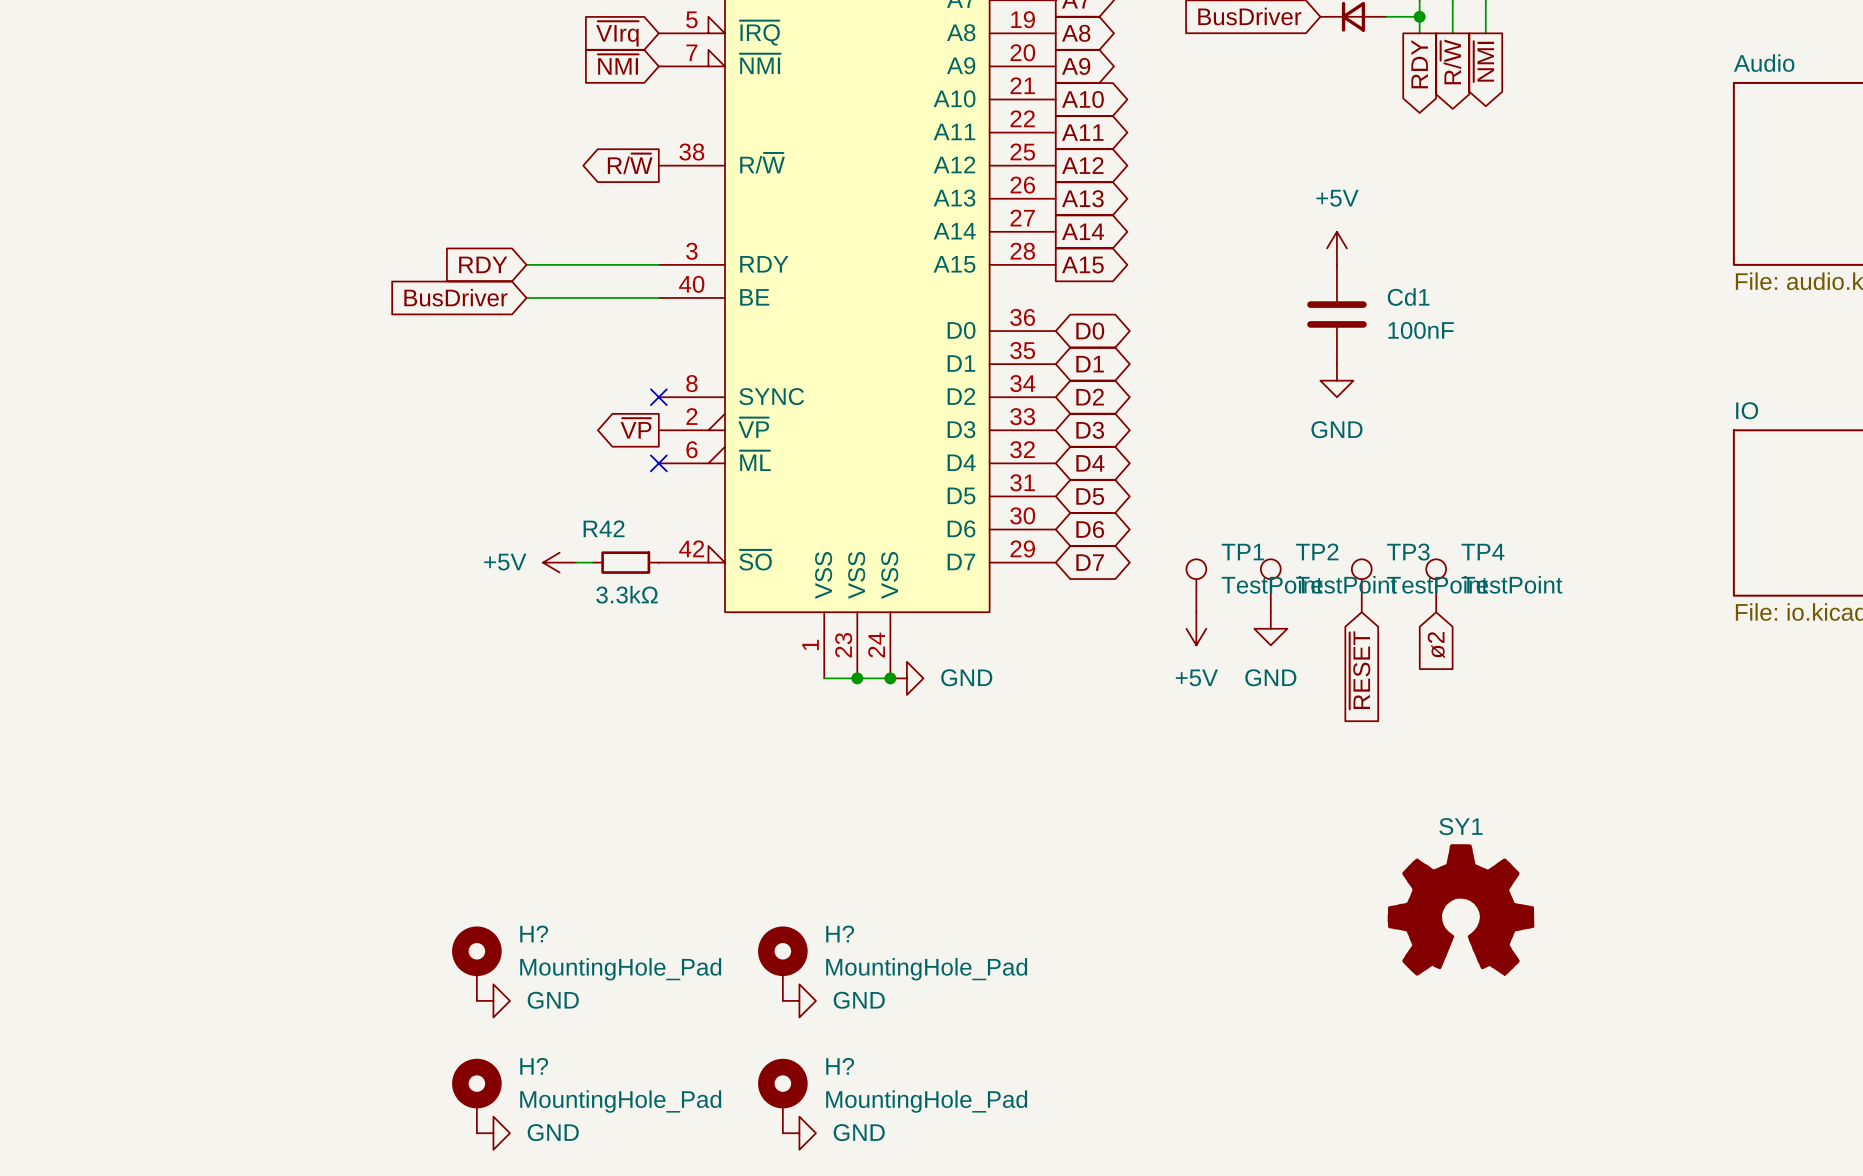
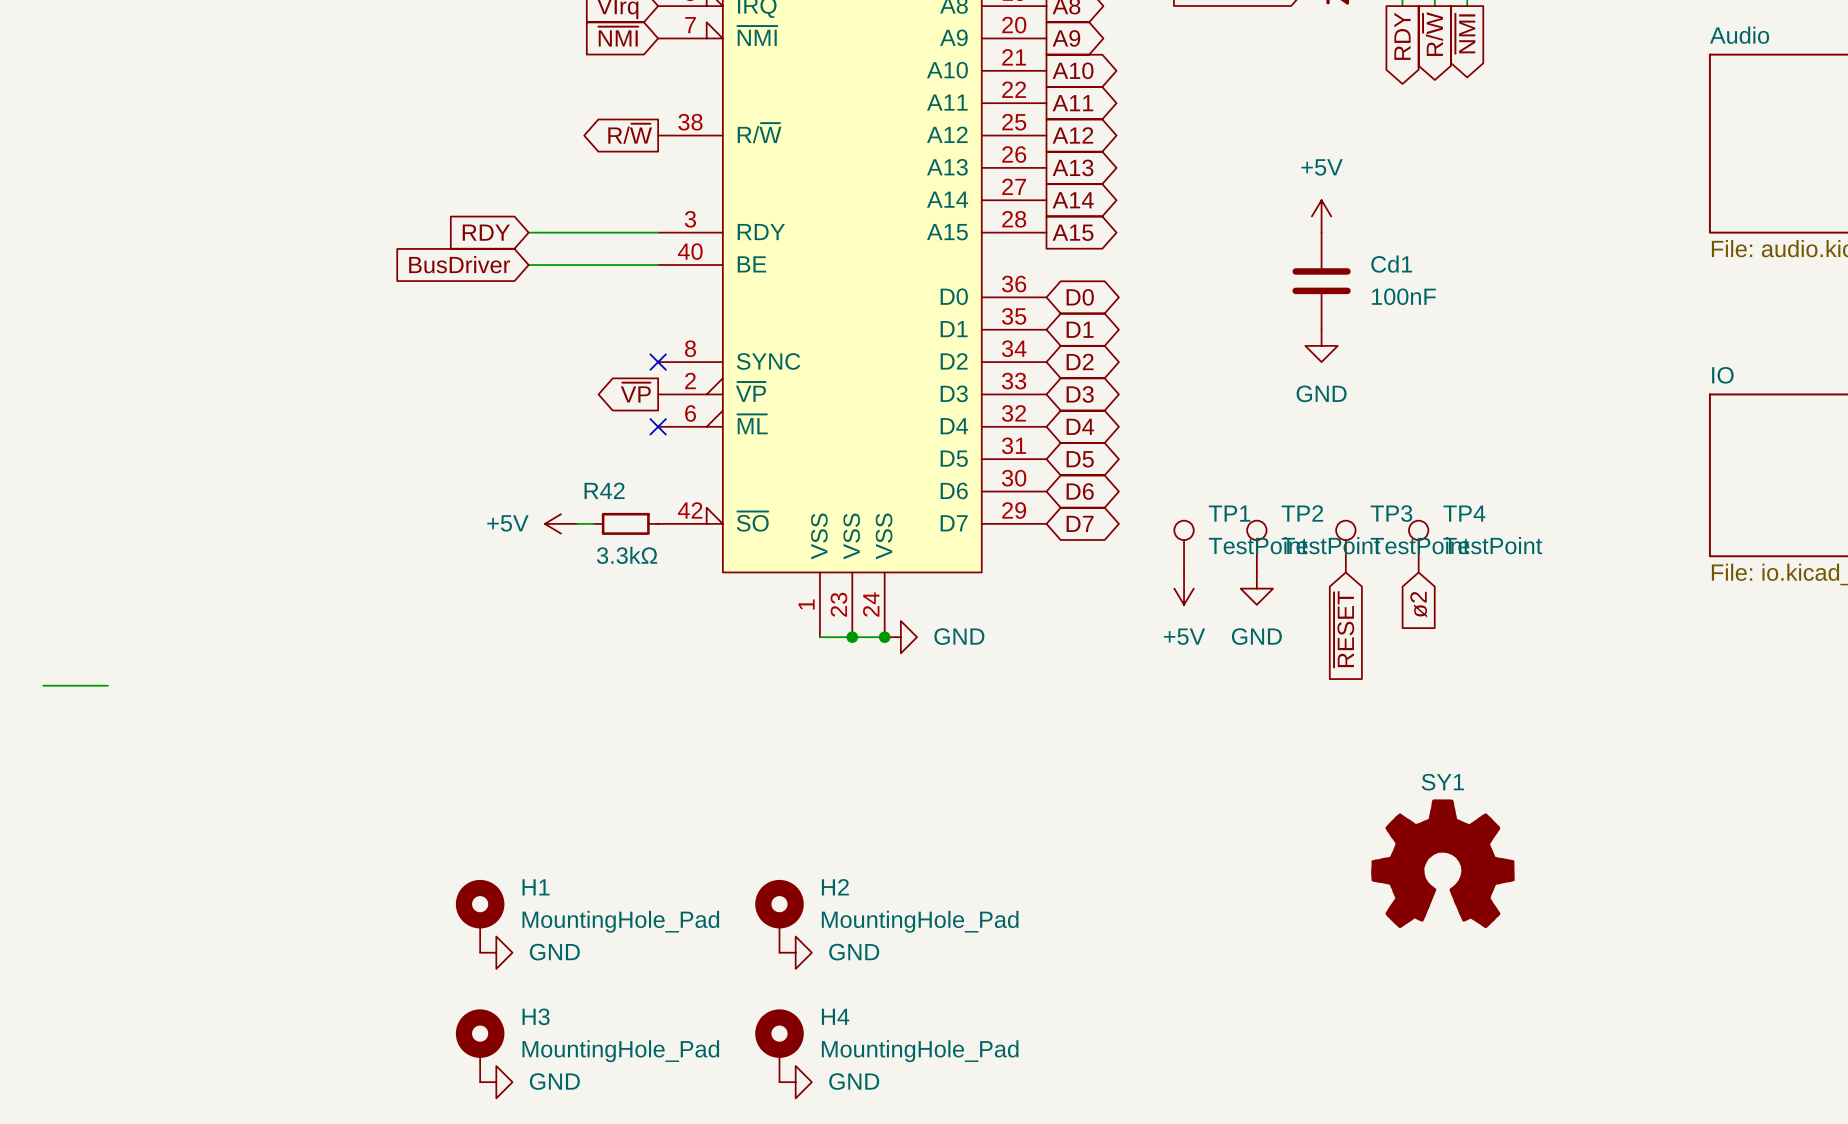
wire: none -> (43, 685) (107, 685)
H? name: H? (534, 934) -> H1 (536, 887)
H? name: H? (840, 934) -> H2 (835, 887)
H? name: H? (534, 1066) -> H3 (536, 1016)
H? name: H? (840, 1066) -> H4 (835, 1016)

